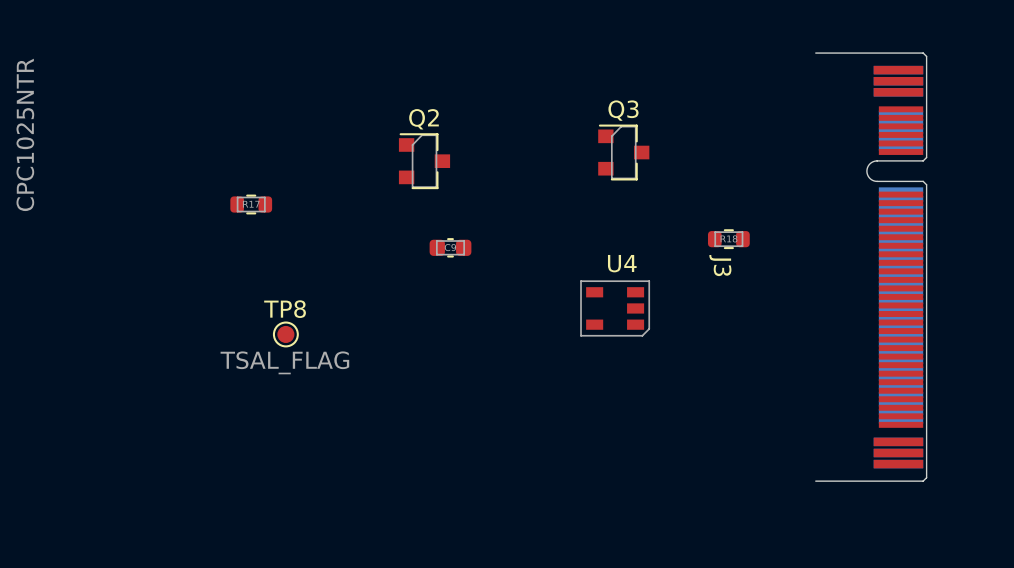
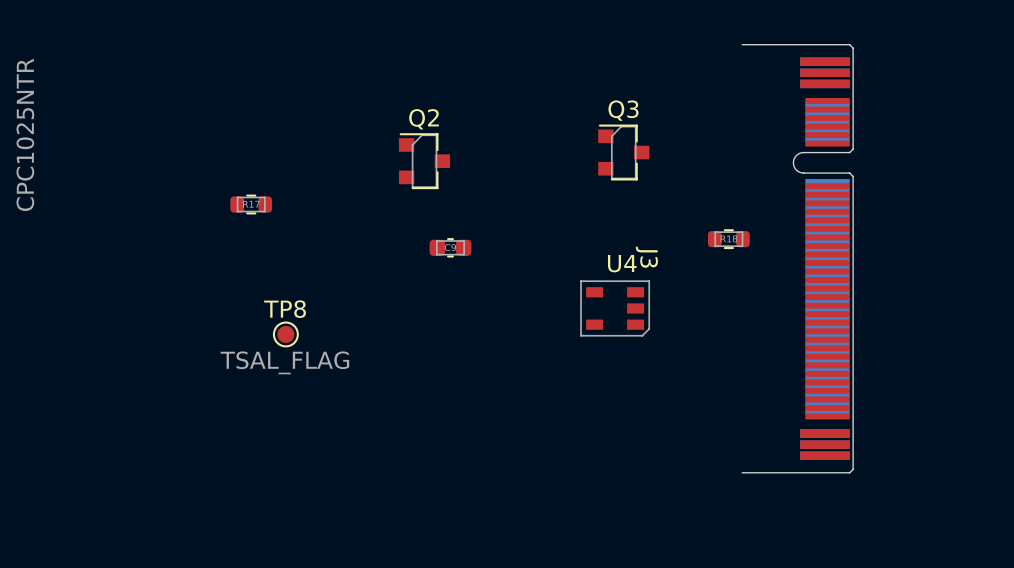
J3 position: (871, 267) -> (797, 258)

